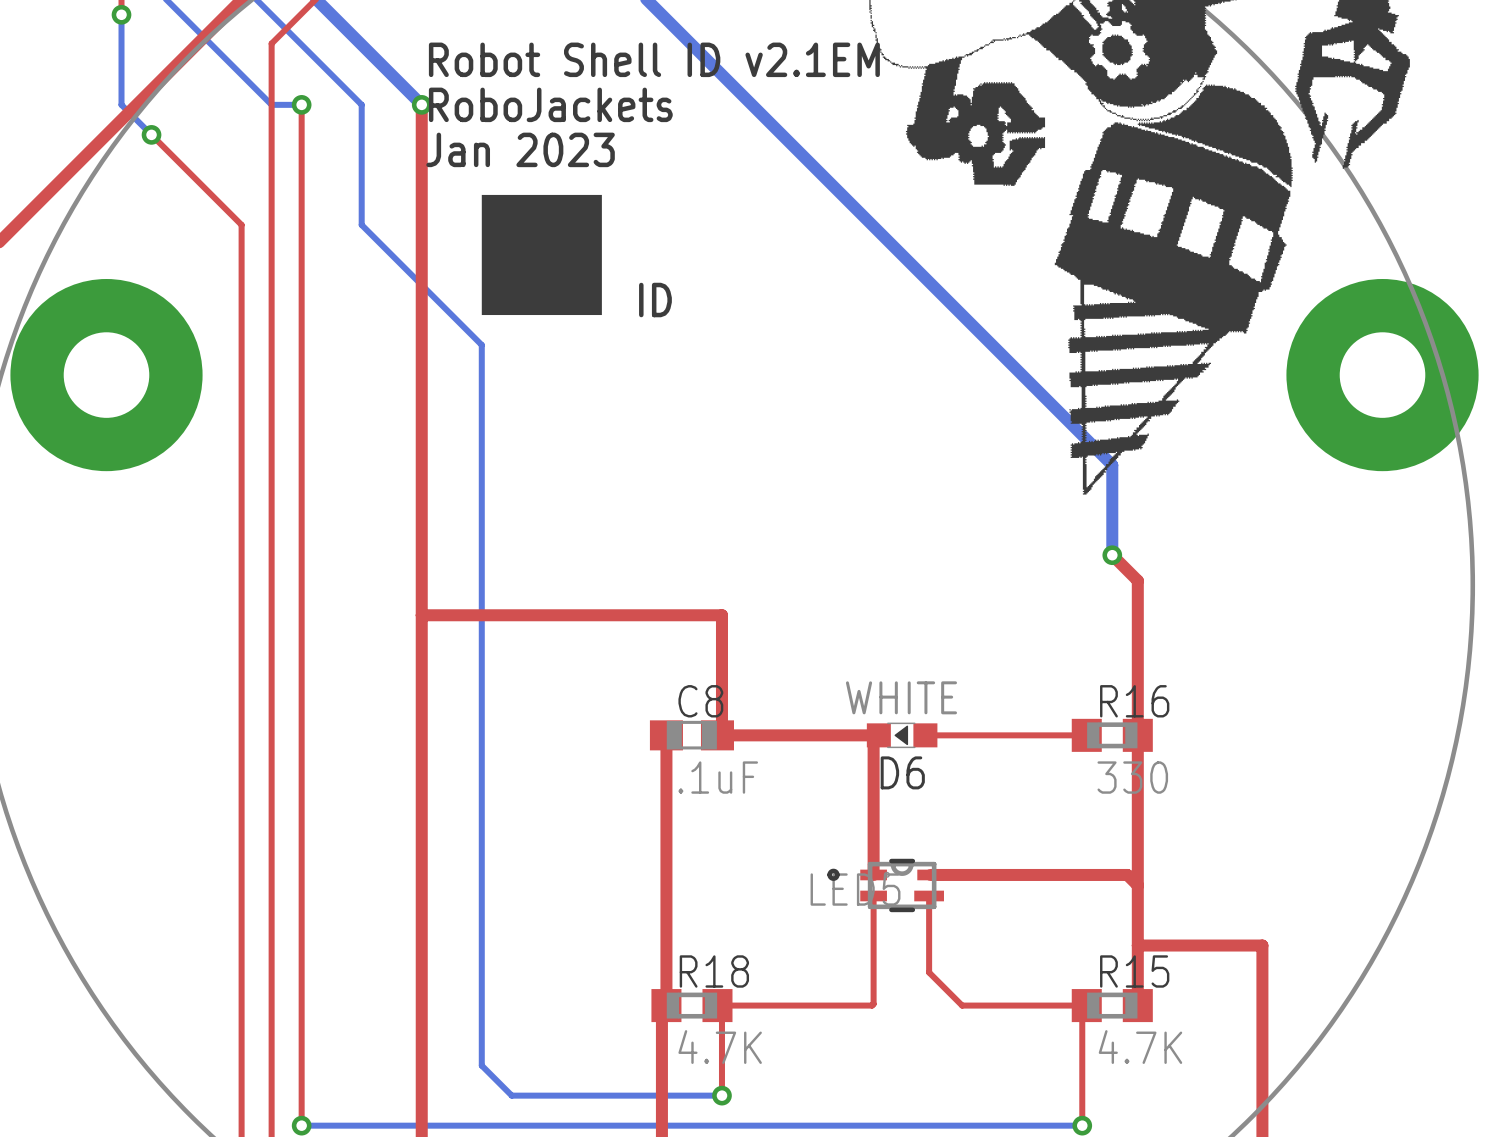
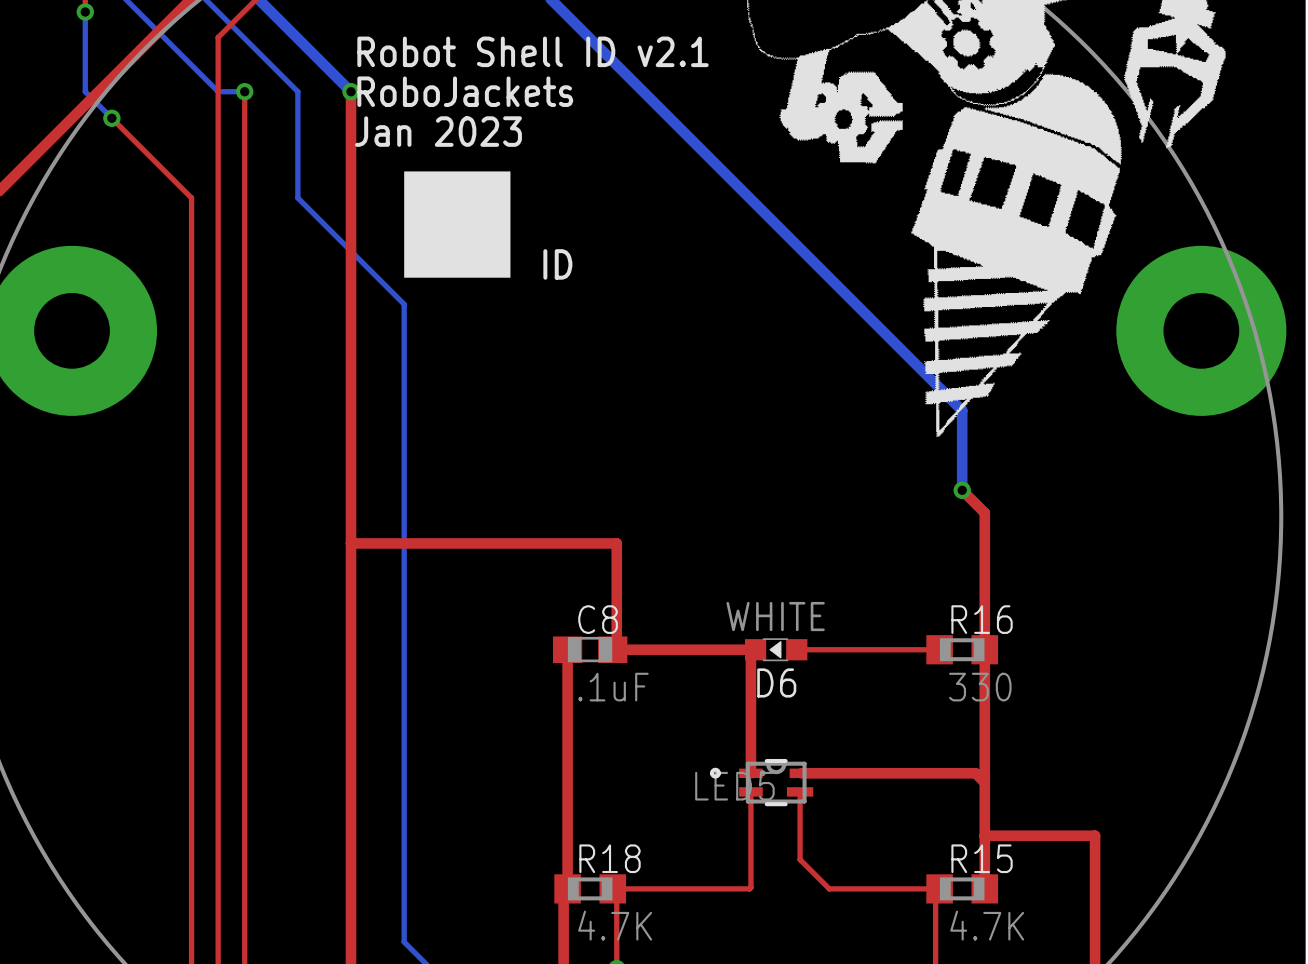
text: Robot Shell ID v2.1EM (654, 59) -> Robot Shell ID v2.1 (533, 51)

